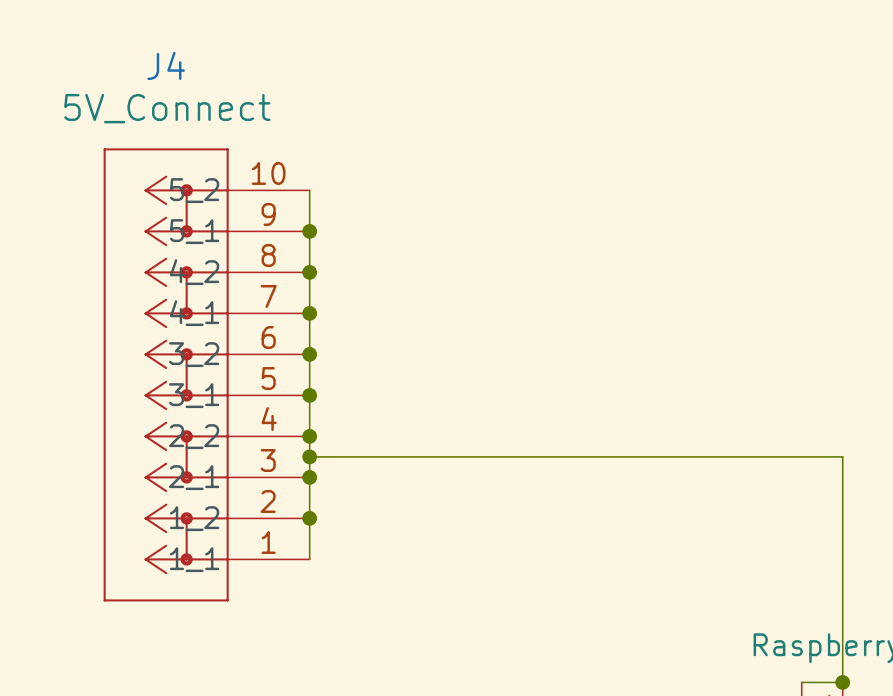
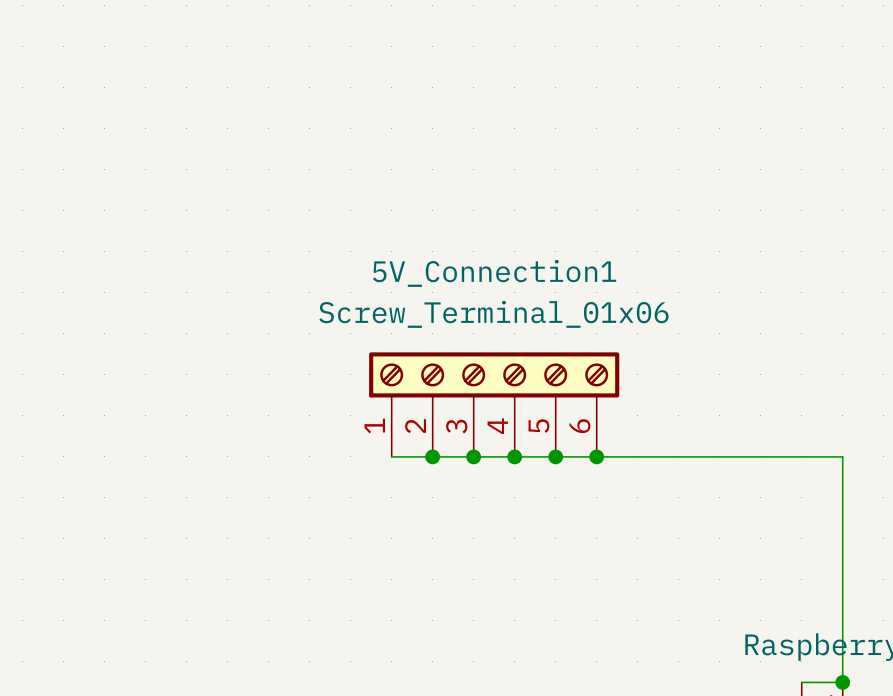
wire: (309, 190) (309, 559) -> none
junction: (309, 231) -> none
junction: (309, 272) -> none
junction: (309, 313) -> none
junction: (309, 354) -> none
J4: 5V_Connect (206, 374) -> none
junction: (309, 395) -> none
5V_Connection1: none -> Screw_Terminal_01x06 (494, 404)
junction: (309, 436) -> none
wire: (309, 456) (391, 456) -> none
junction: (309, 456) -> none
junction: none -> (432, 456)
junction: none -> (473, 456)
junction: none -> (514, 456)
junction: none -> (555, 456)
junction: none -> (596, 456)
junction: (309, 477) -> none
junction: (309, 518) -> none

